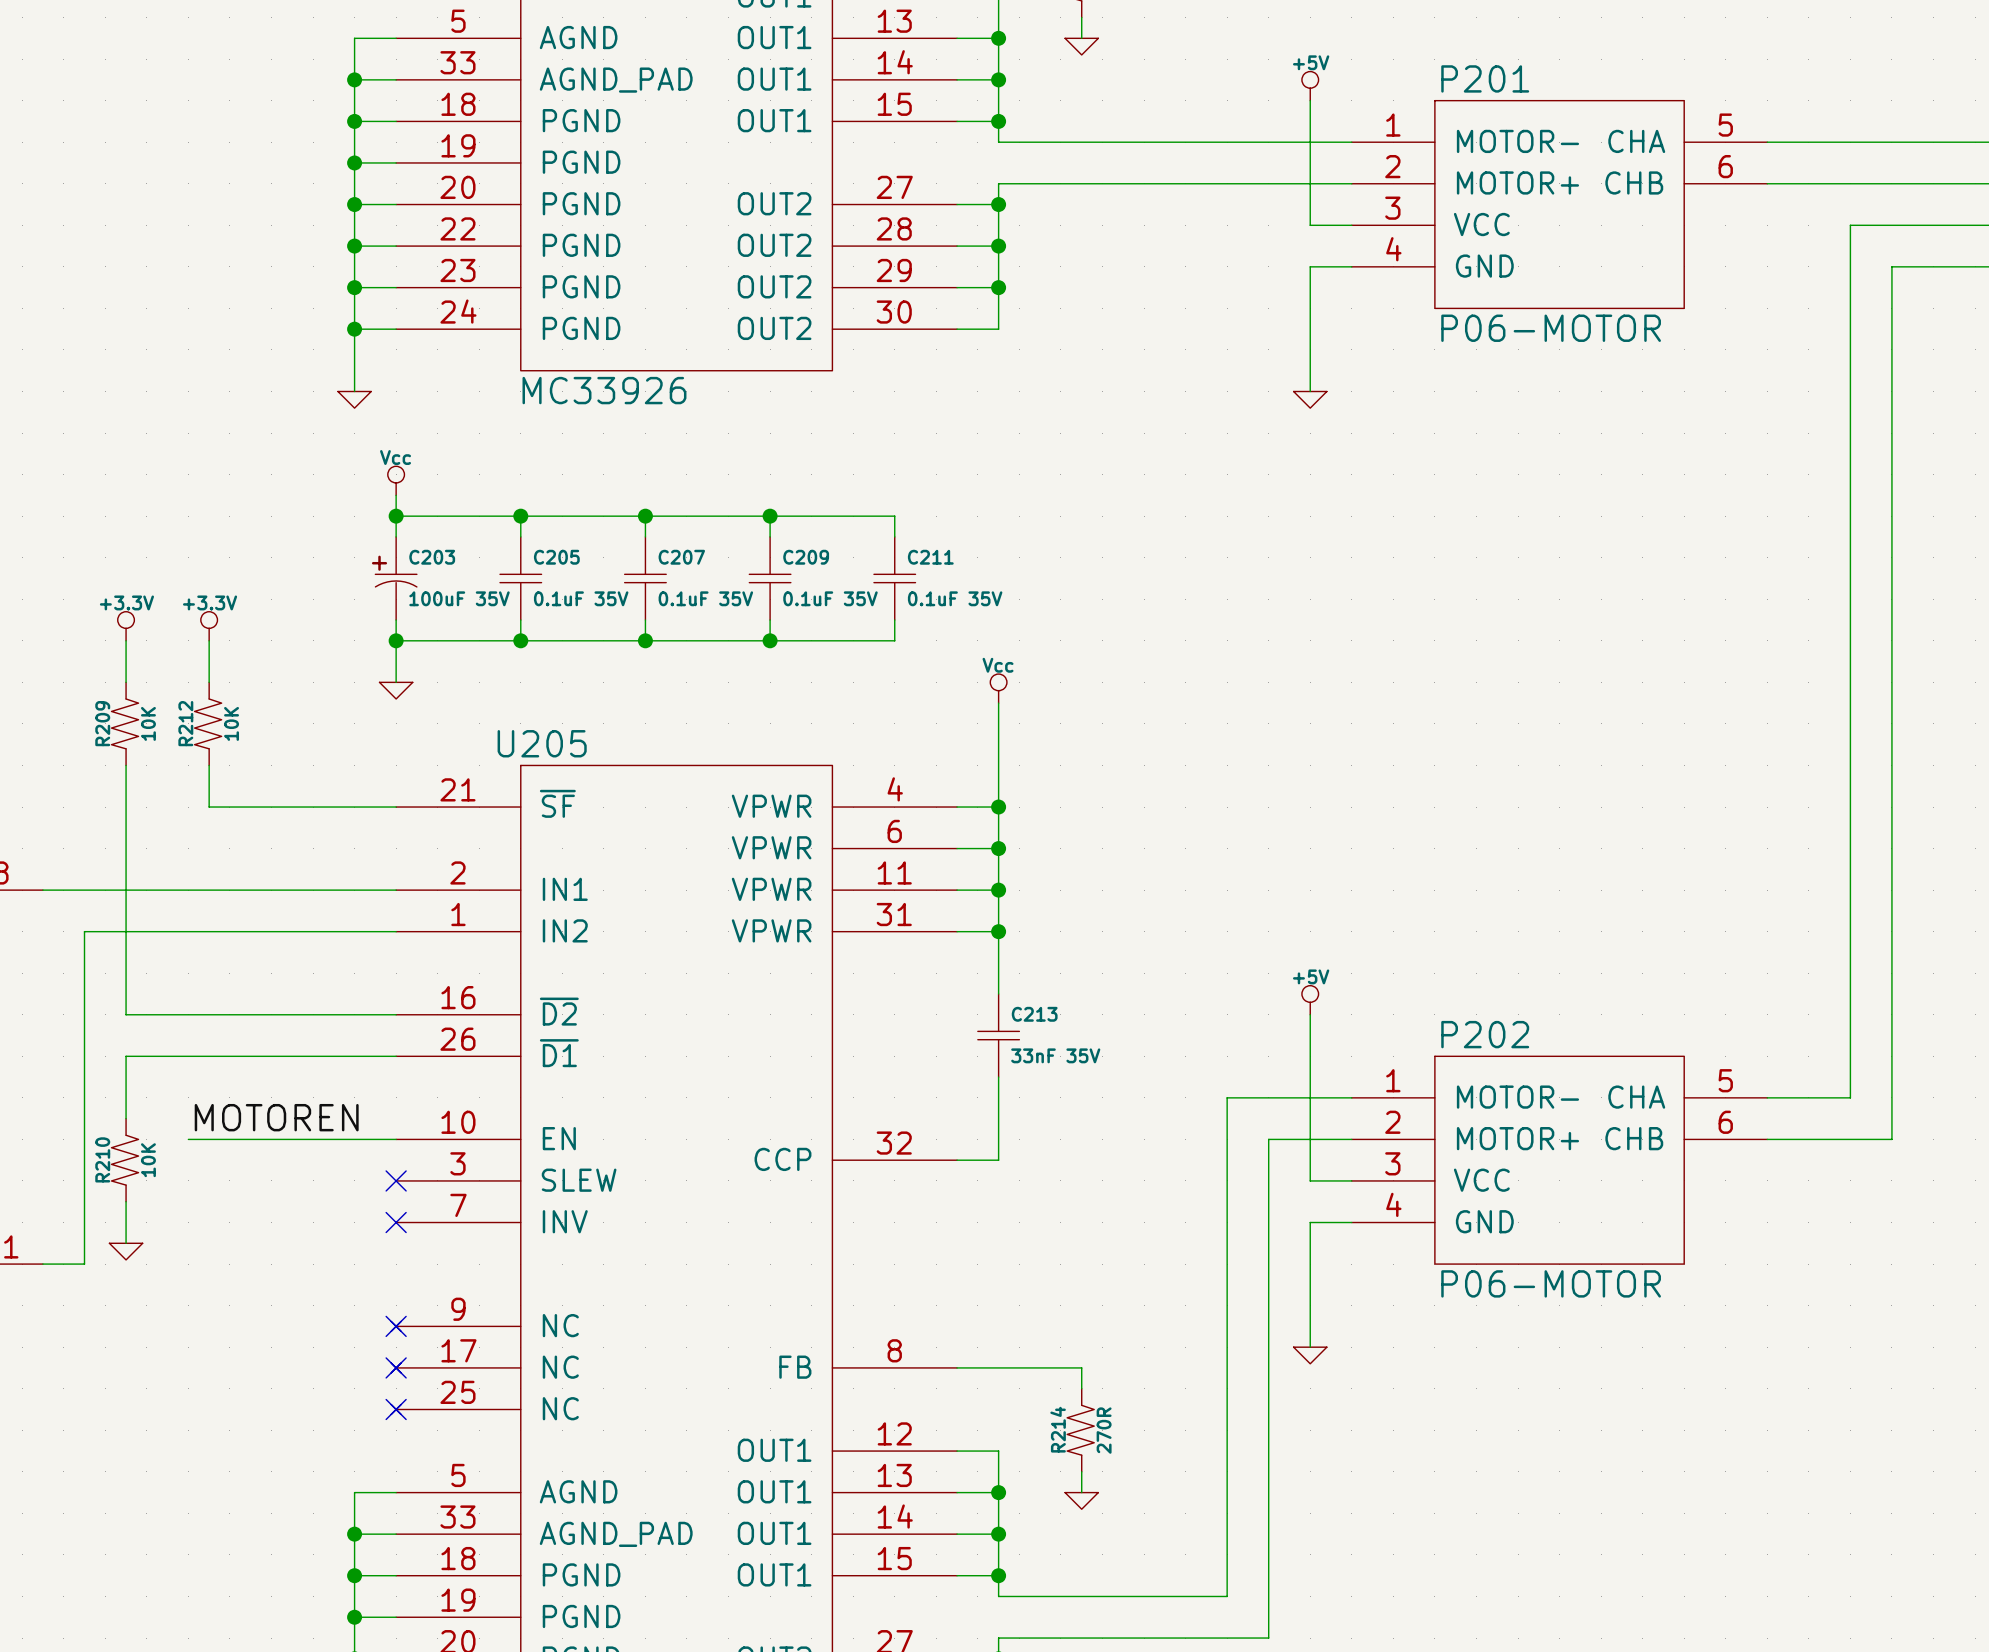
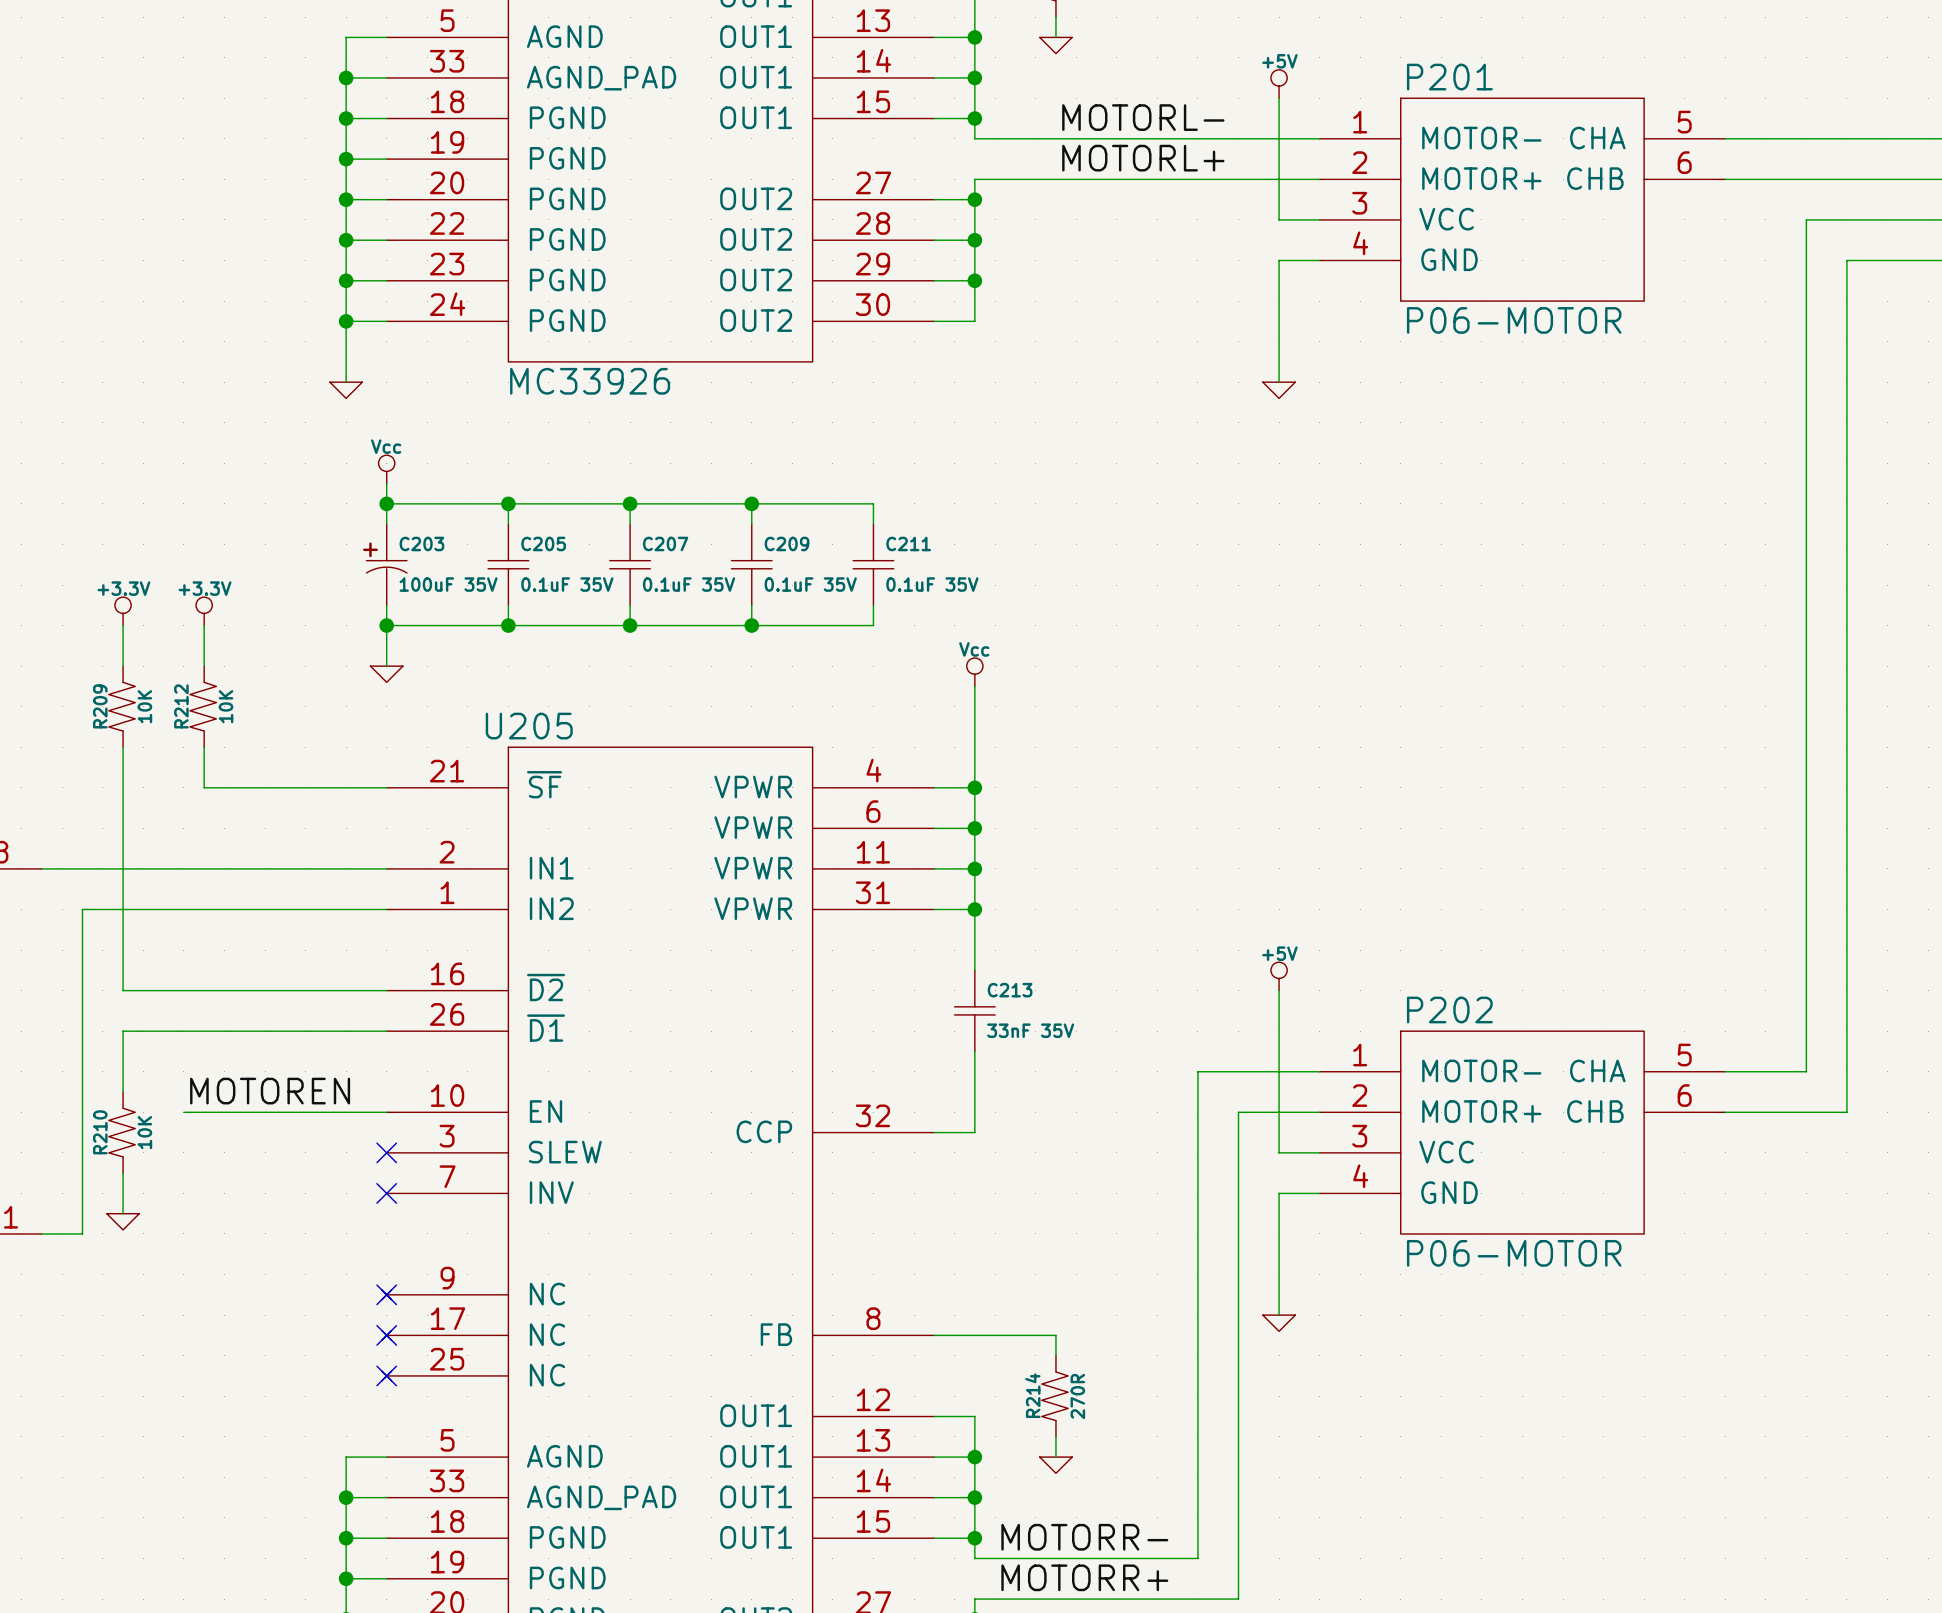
label: none -> MOTORL- (1143, 117)
label: none -> MOTORL+ (1143, 158)
label: none -> MOTORR- (1084, 1537)
label: none -> MOTORR+ (1084, 1577)

